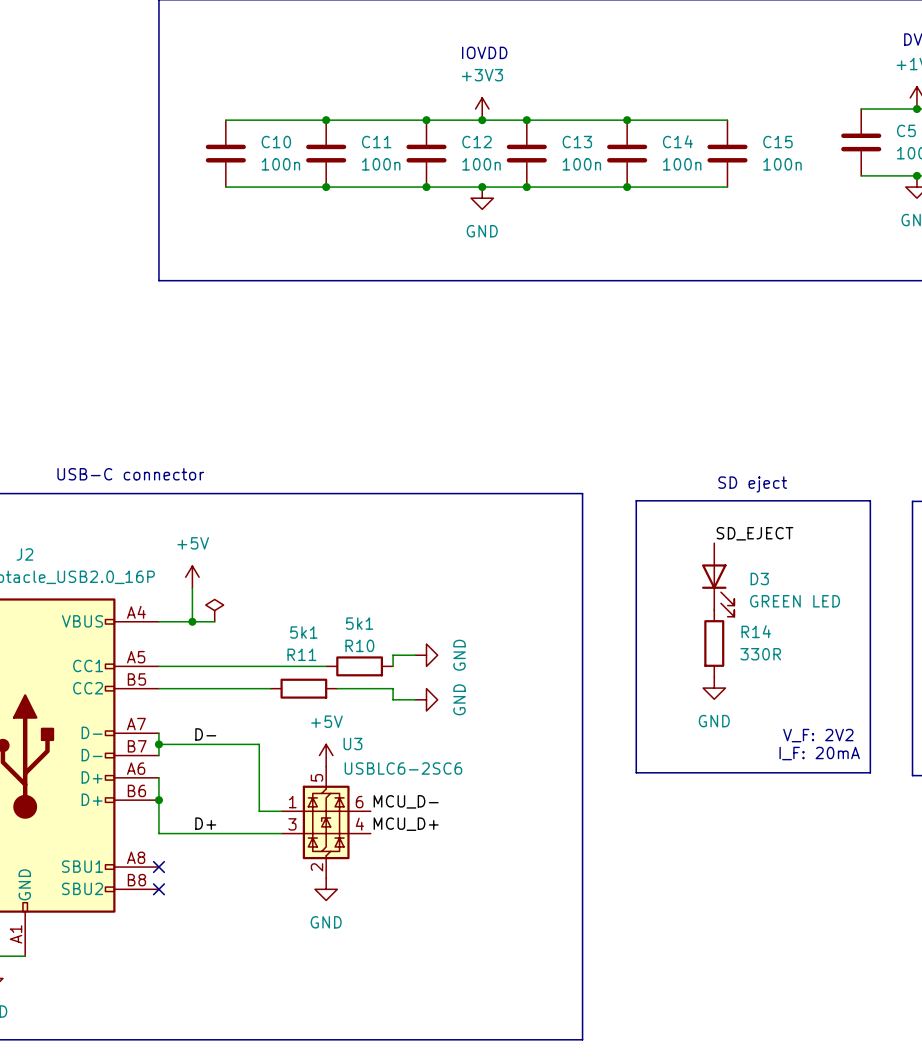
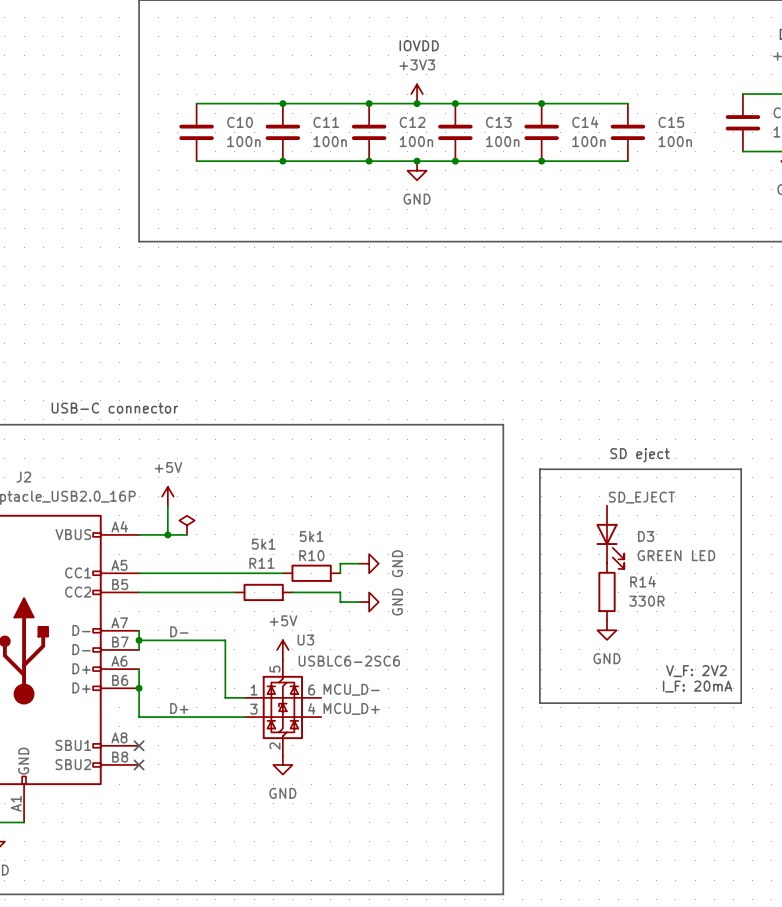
text position: SD eject (752, 484) -> SD eject (640, 455)
line: (636, 500) (870, 500) (870, 772) (636, 772) (636, 500) -> (539, 469) (741, 469) (741, 703) (539, 703) (539, 469)
label position: SD_EJECT (754, 533) -> SD_EJECT (641, 497)
D3 position: (718, 579) -> (610, 537)
R14 position: (714, 643) -> (607, 591)
power symbol position: GND (714, 688) -> GND (607, 630)
text position: V_F: 2V2 (818, 735) -> V_F: 2V2 (696, 671)
text position: I_F: 20mA (819, 753) -> I_F: 20mA (697, 686)

